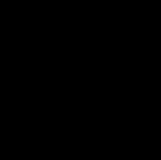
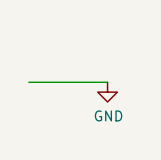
wire: none -> (28, 82) (107, 82)
power symbol: none -> GND (107, 92)

